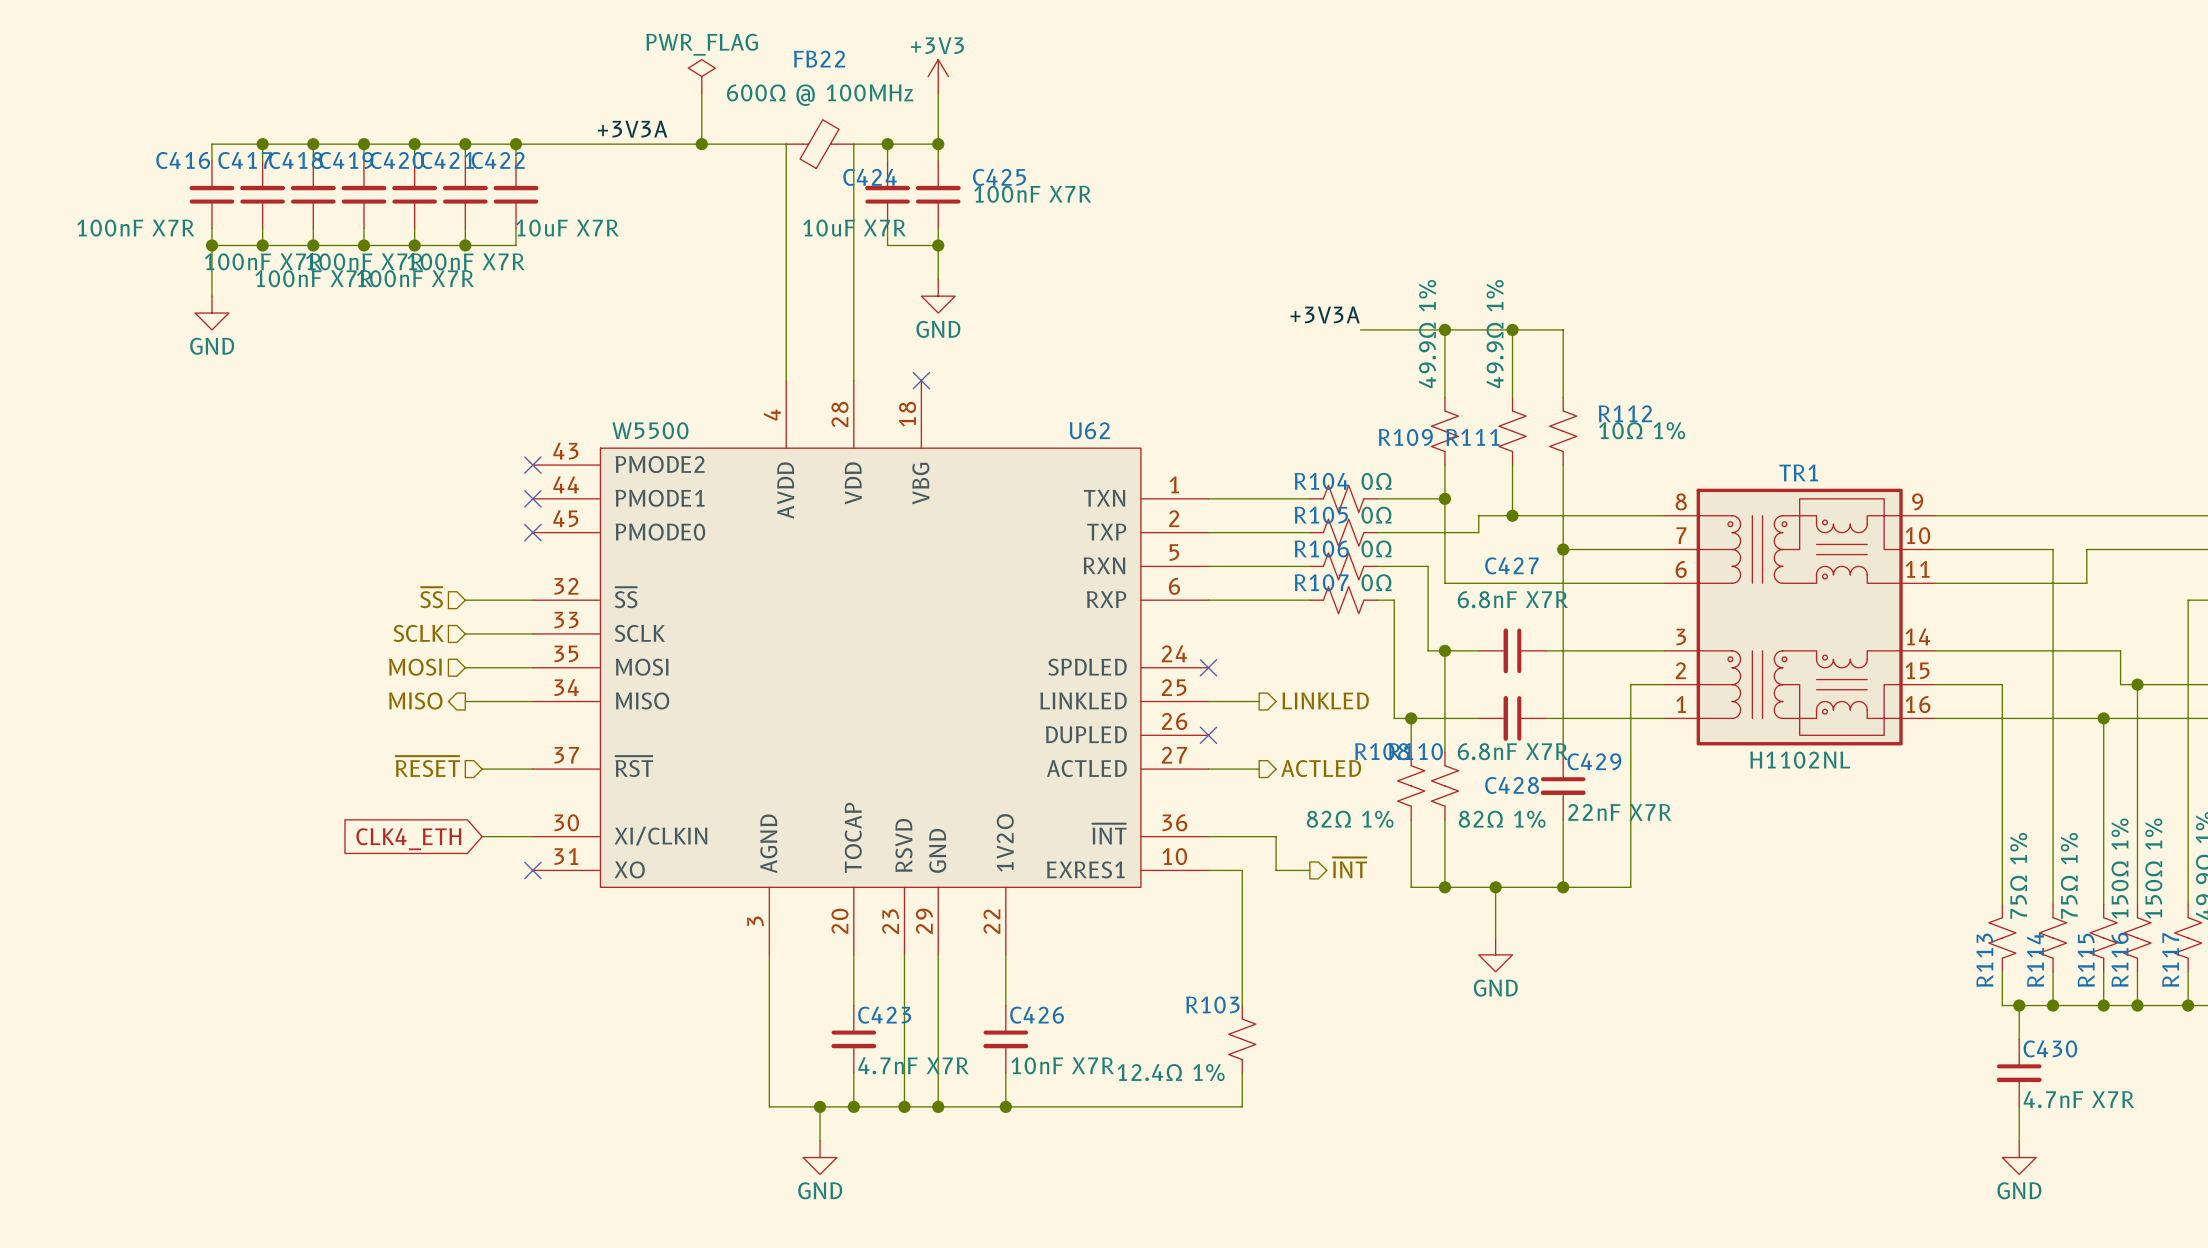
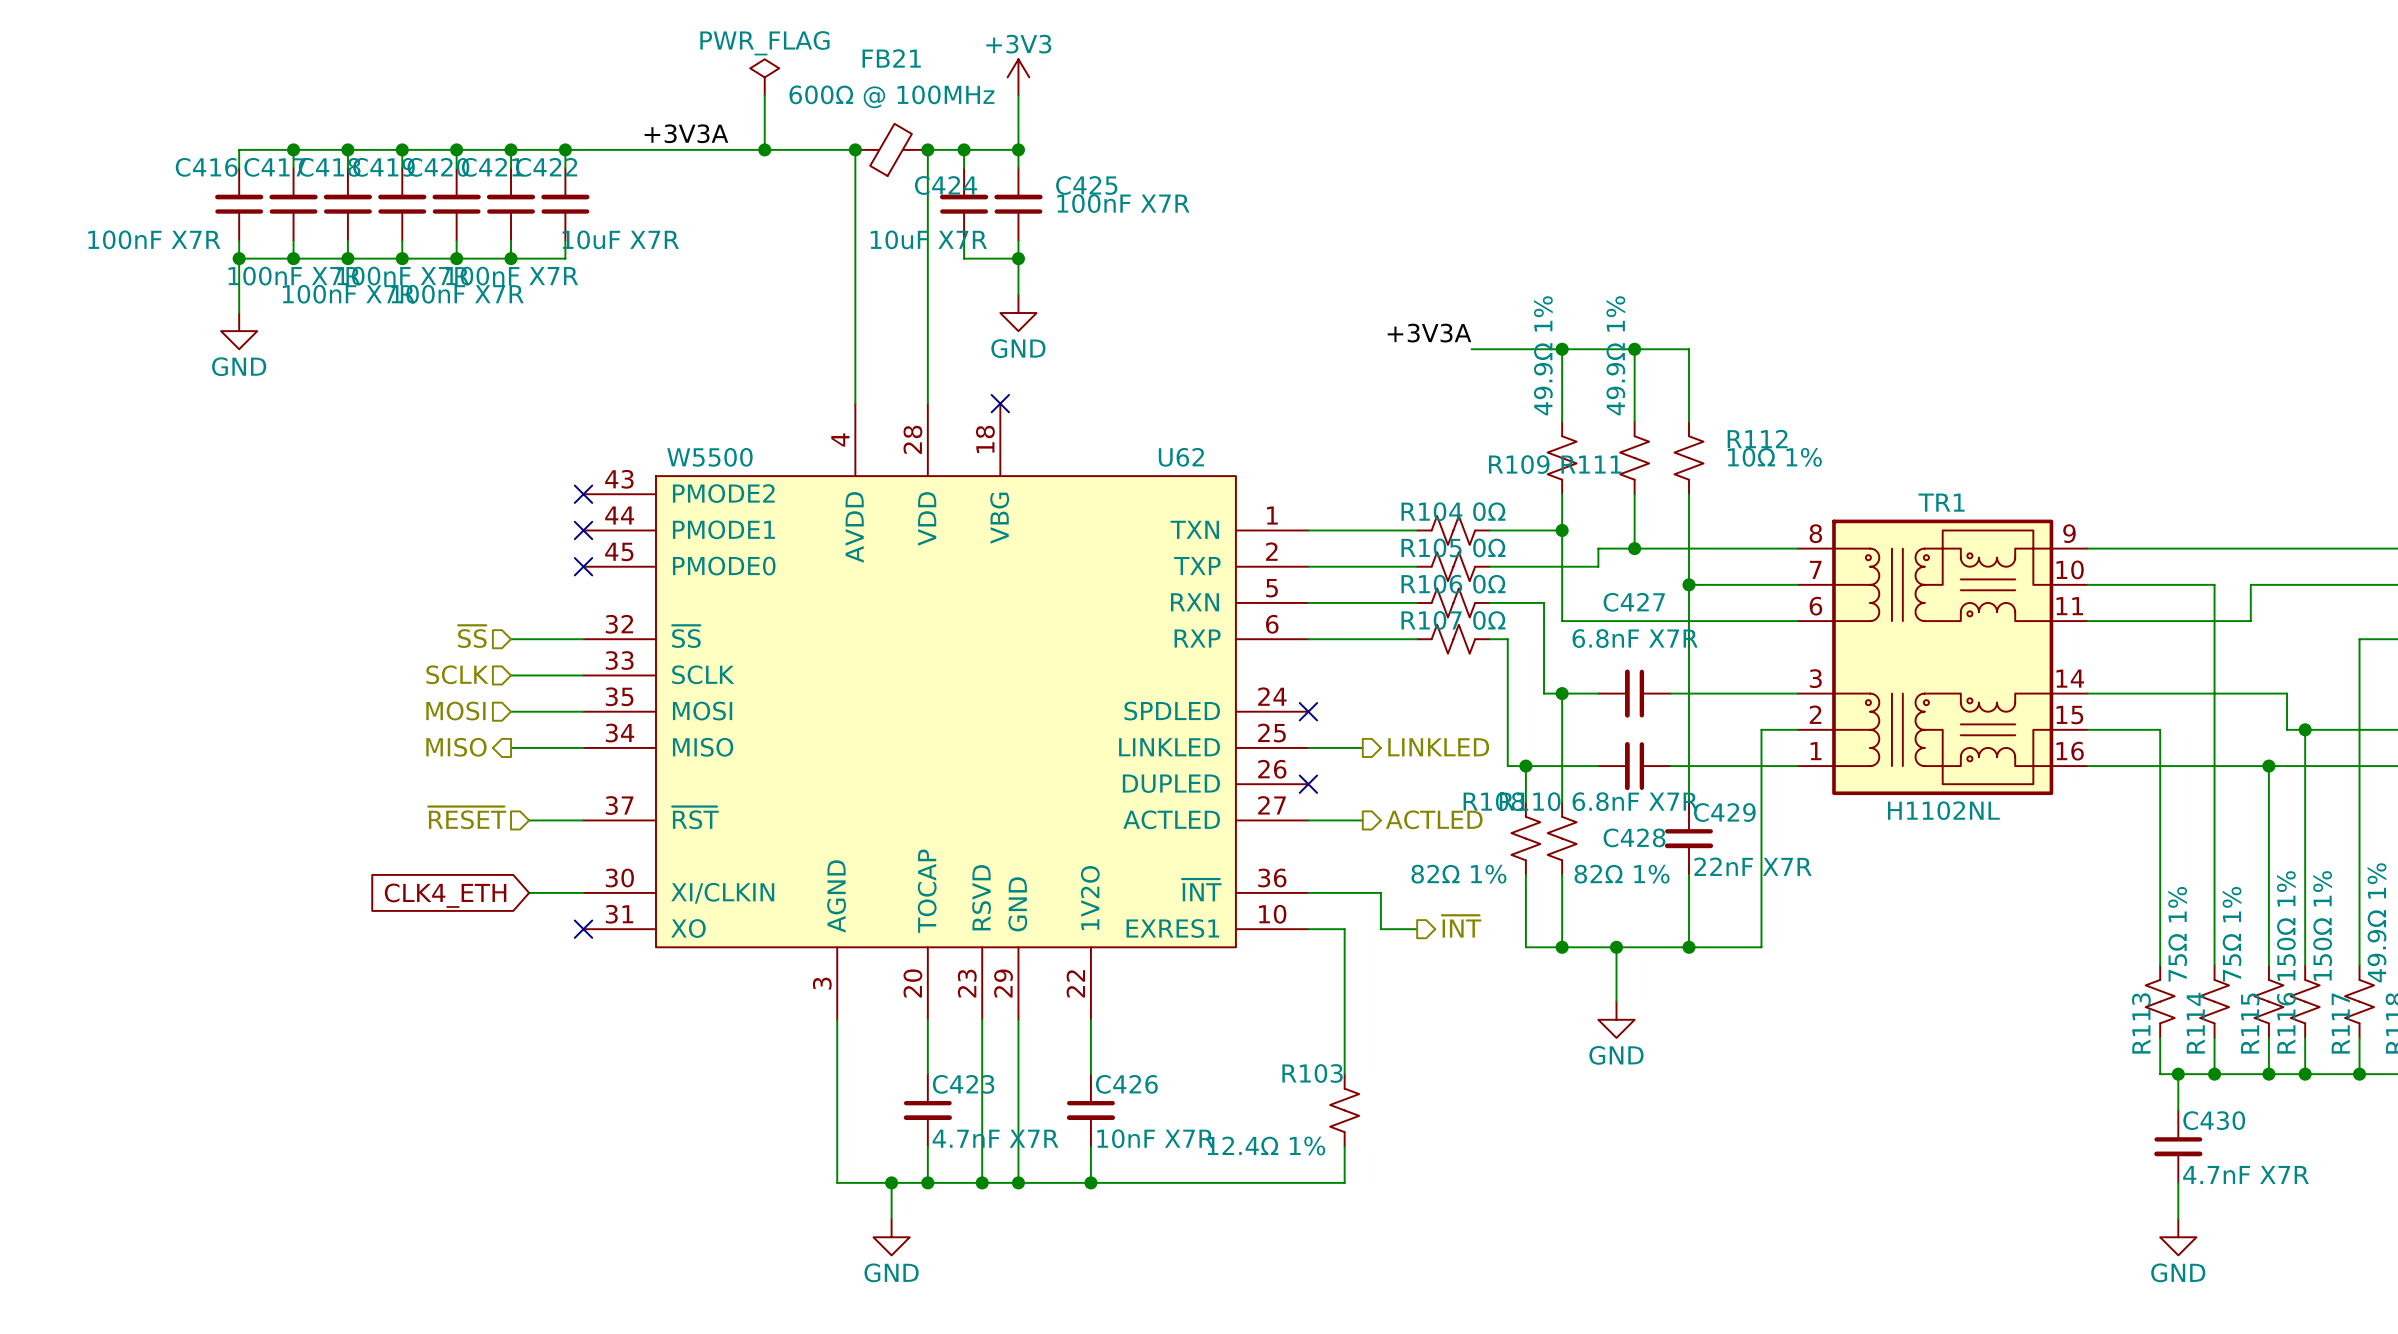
FB22 name: FB22 (819, 59) -> FB21 (891, 58)
junction: none -> (855, 149)
junction: none -> (927, 149)

